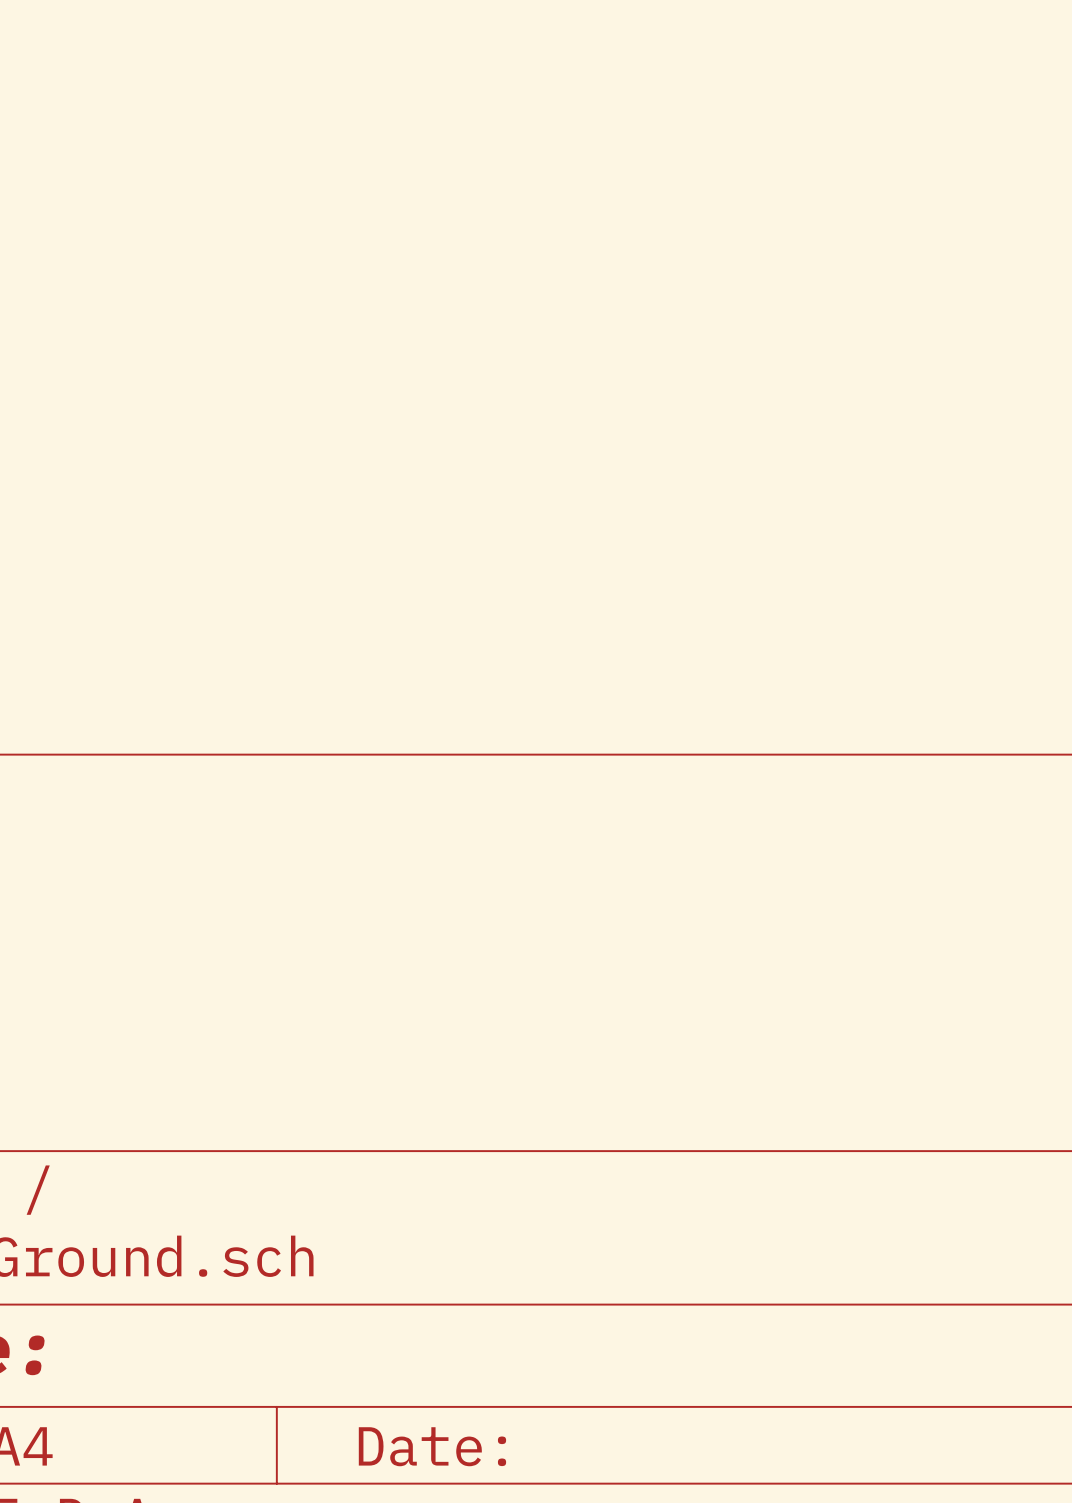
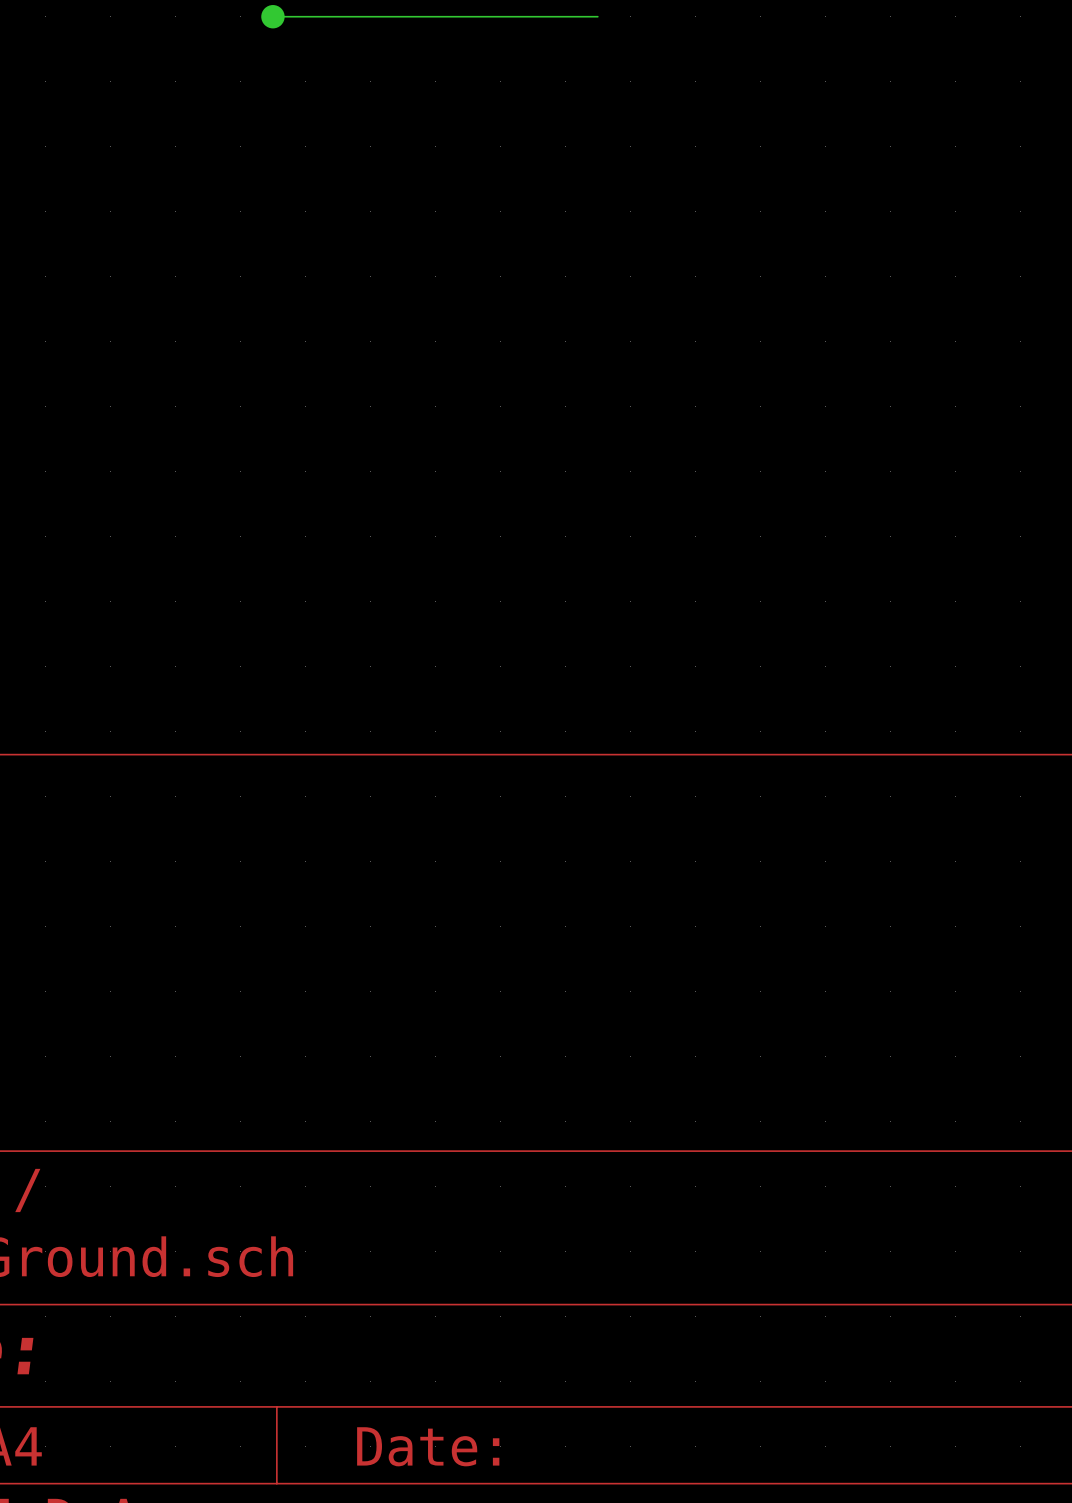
wire: none -> (272, 16) (597, 16)
junction: none -> (272, 16)

